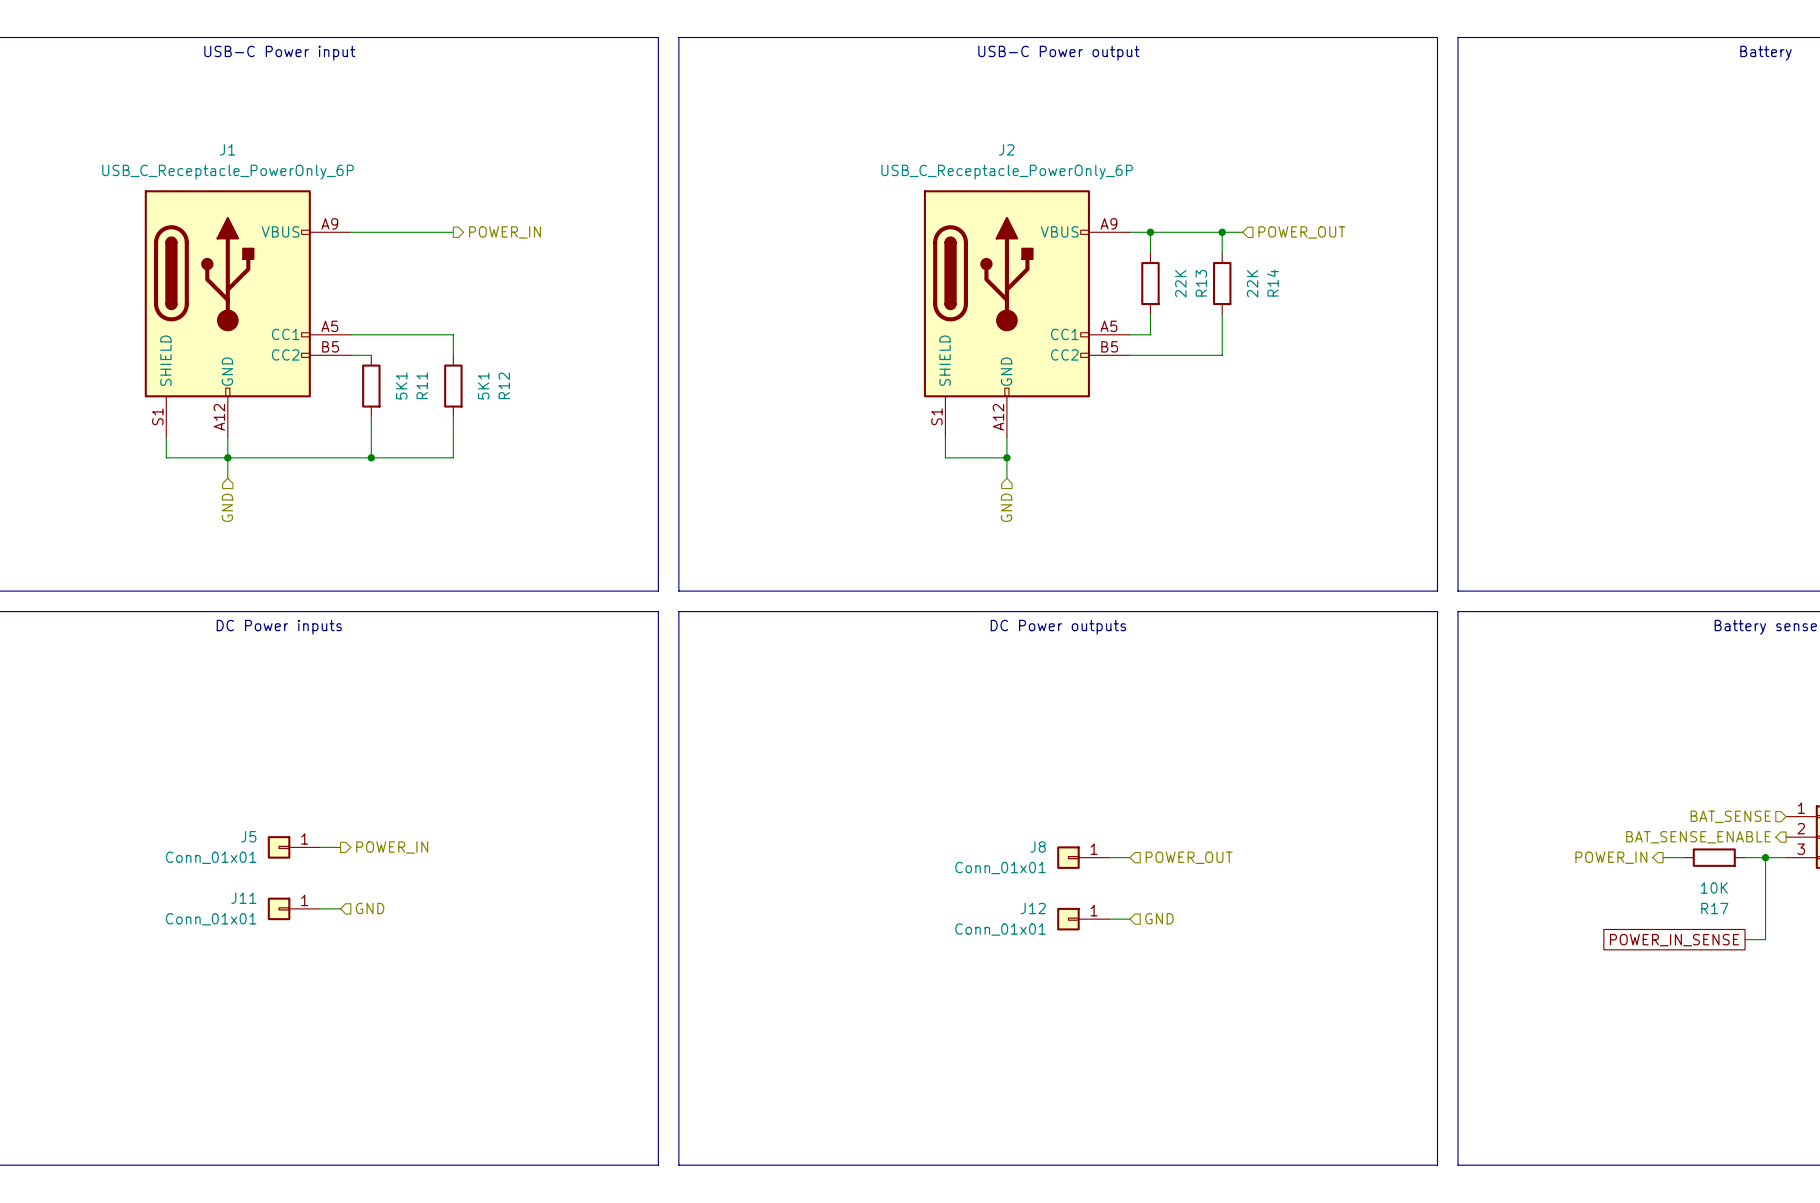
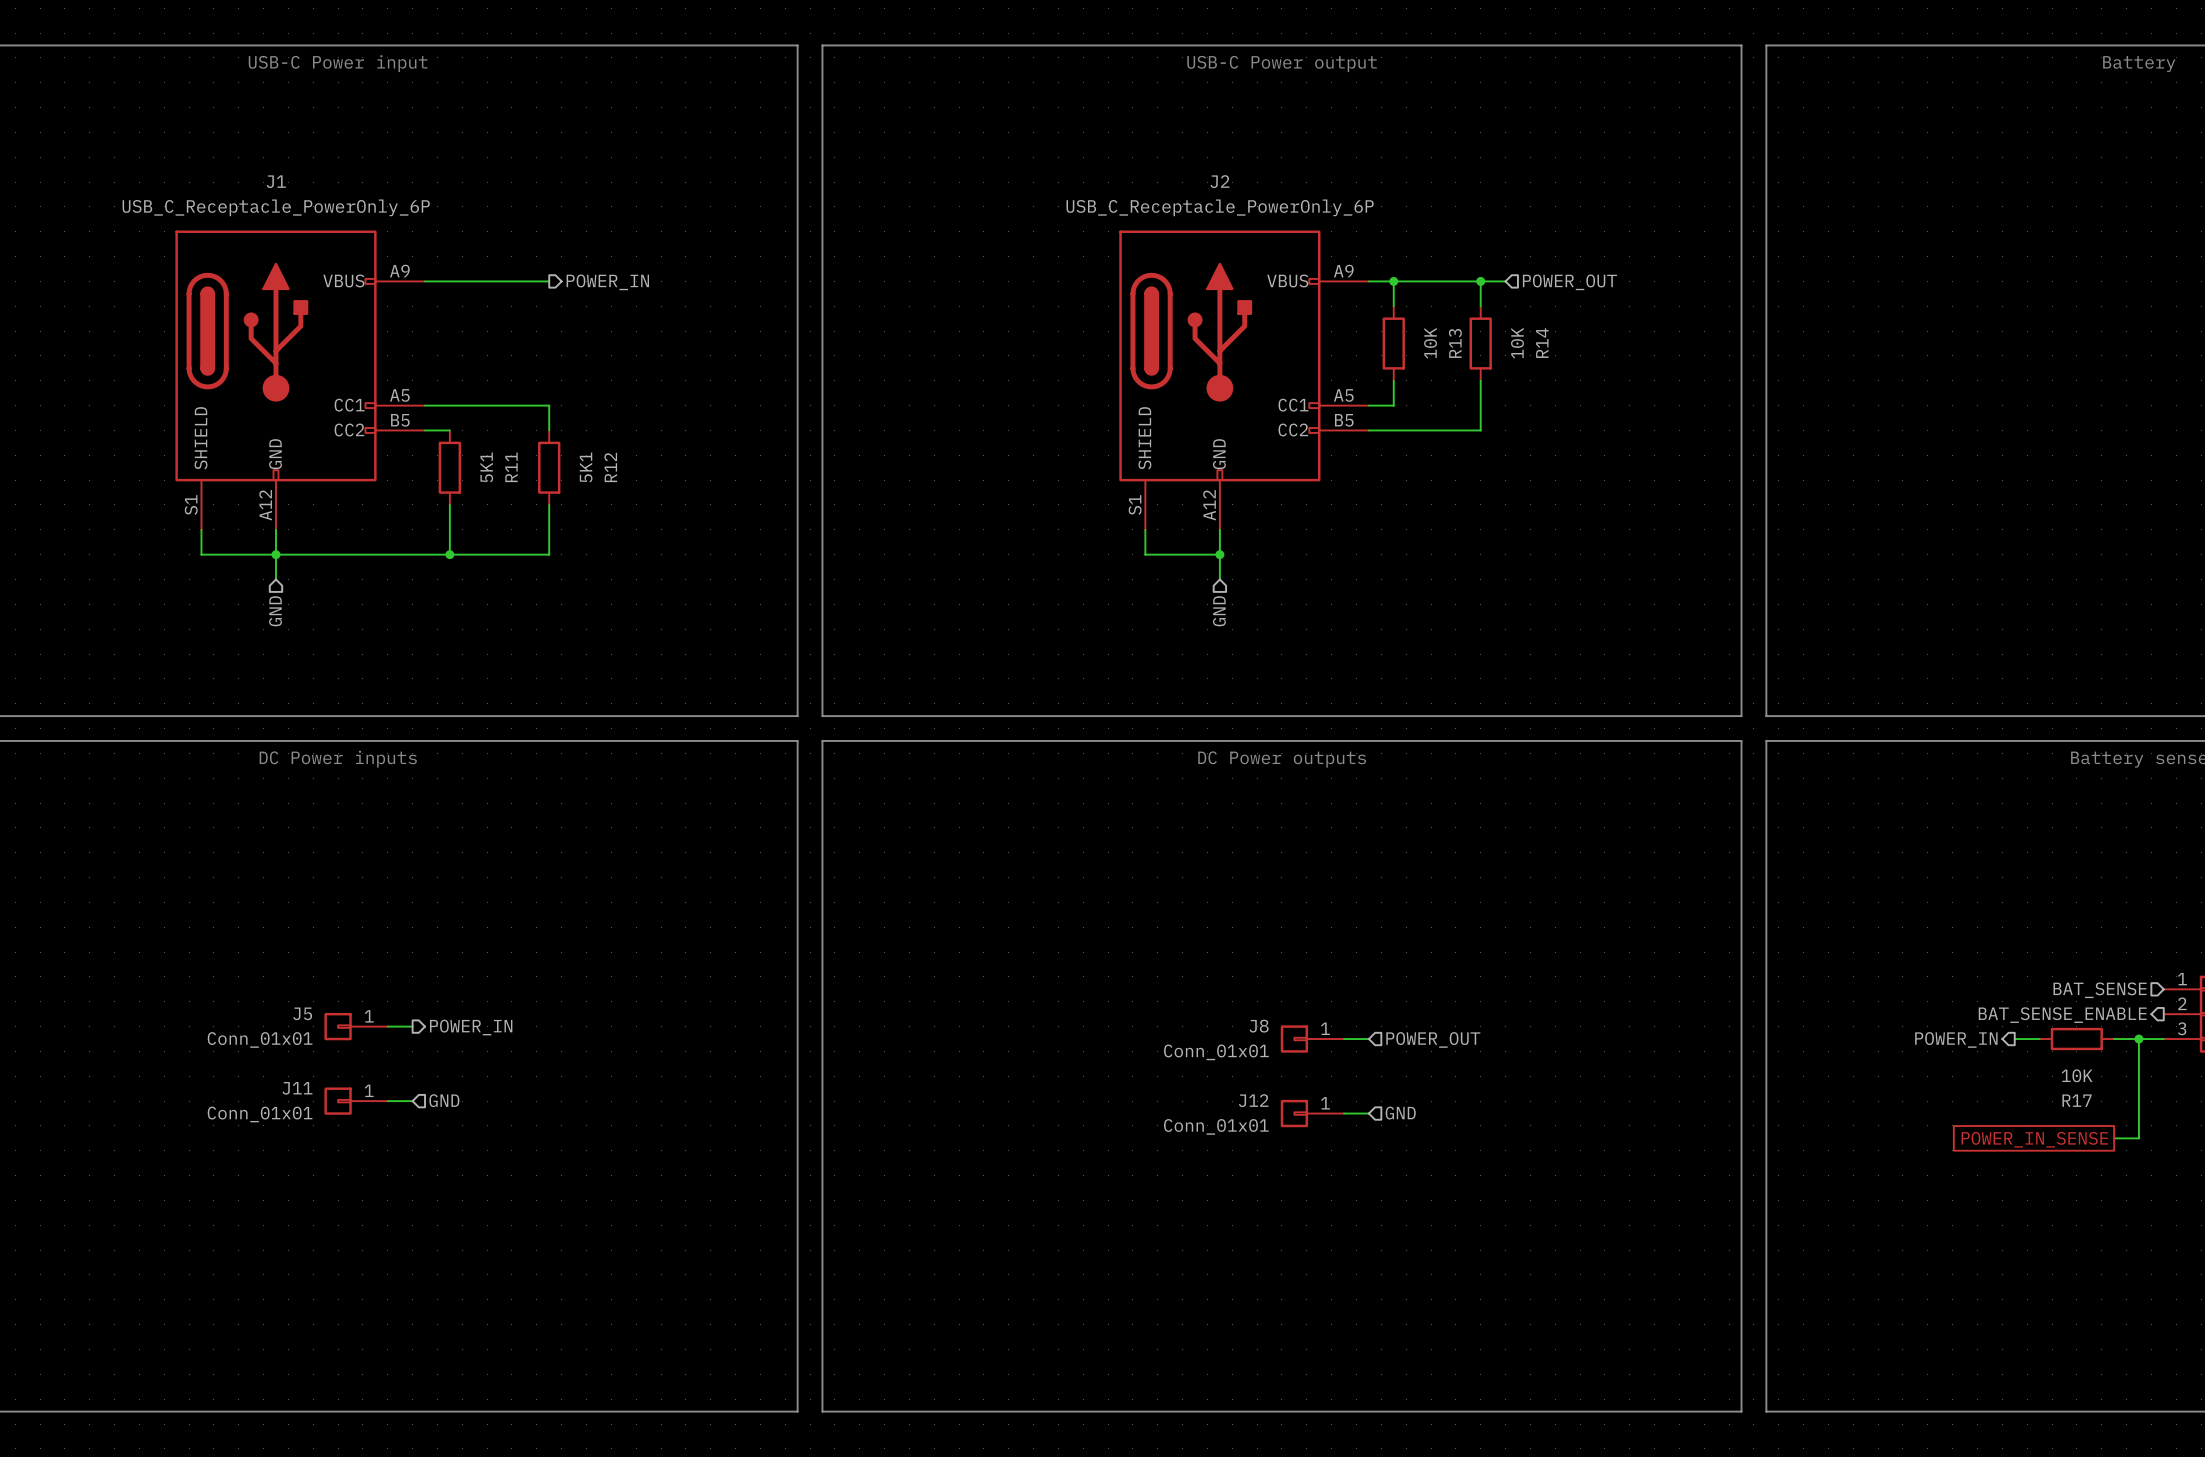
R13 value: 22K (1180, 283) -> 10K (1430, 343)
R14 value: 22K (1252, 283) -> 10K (1517, 343)

